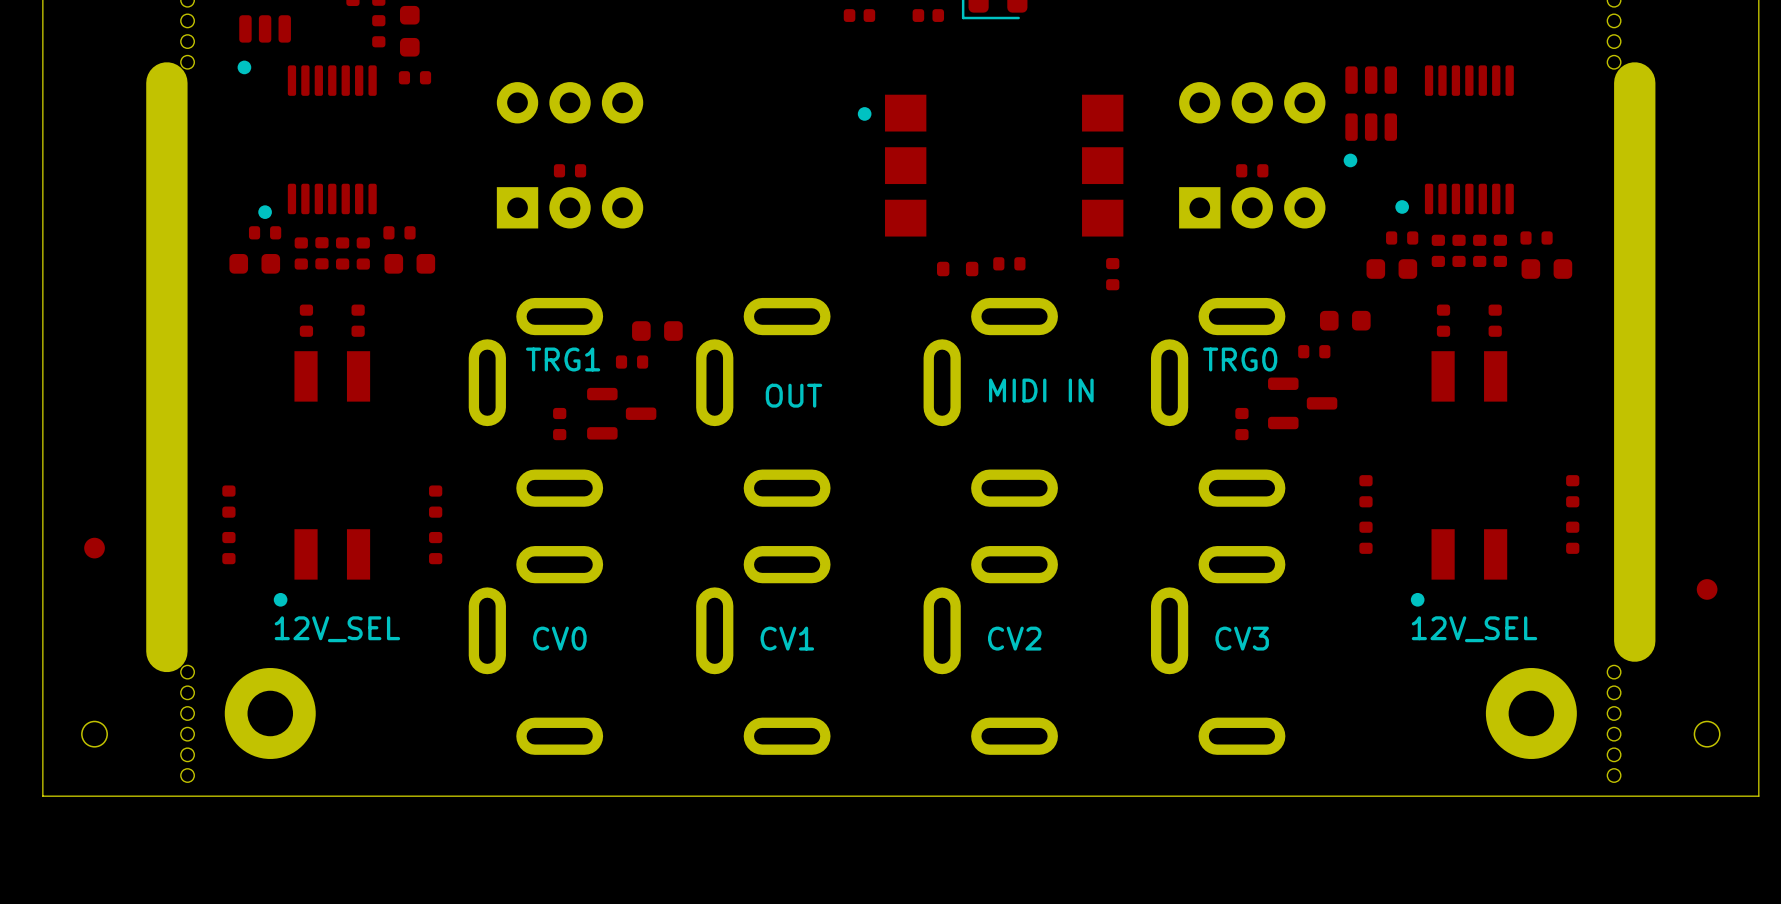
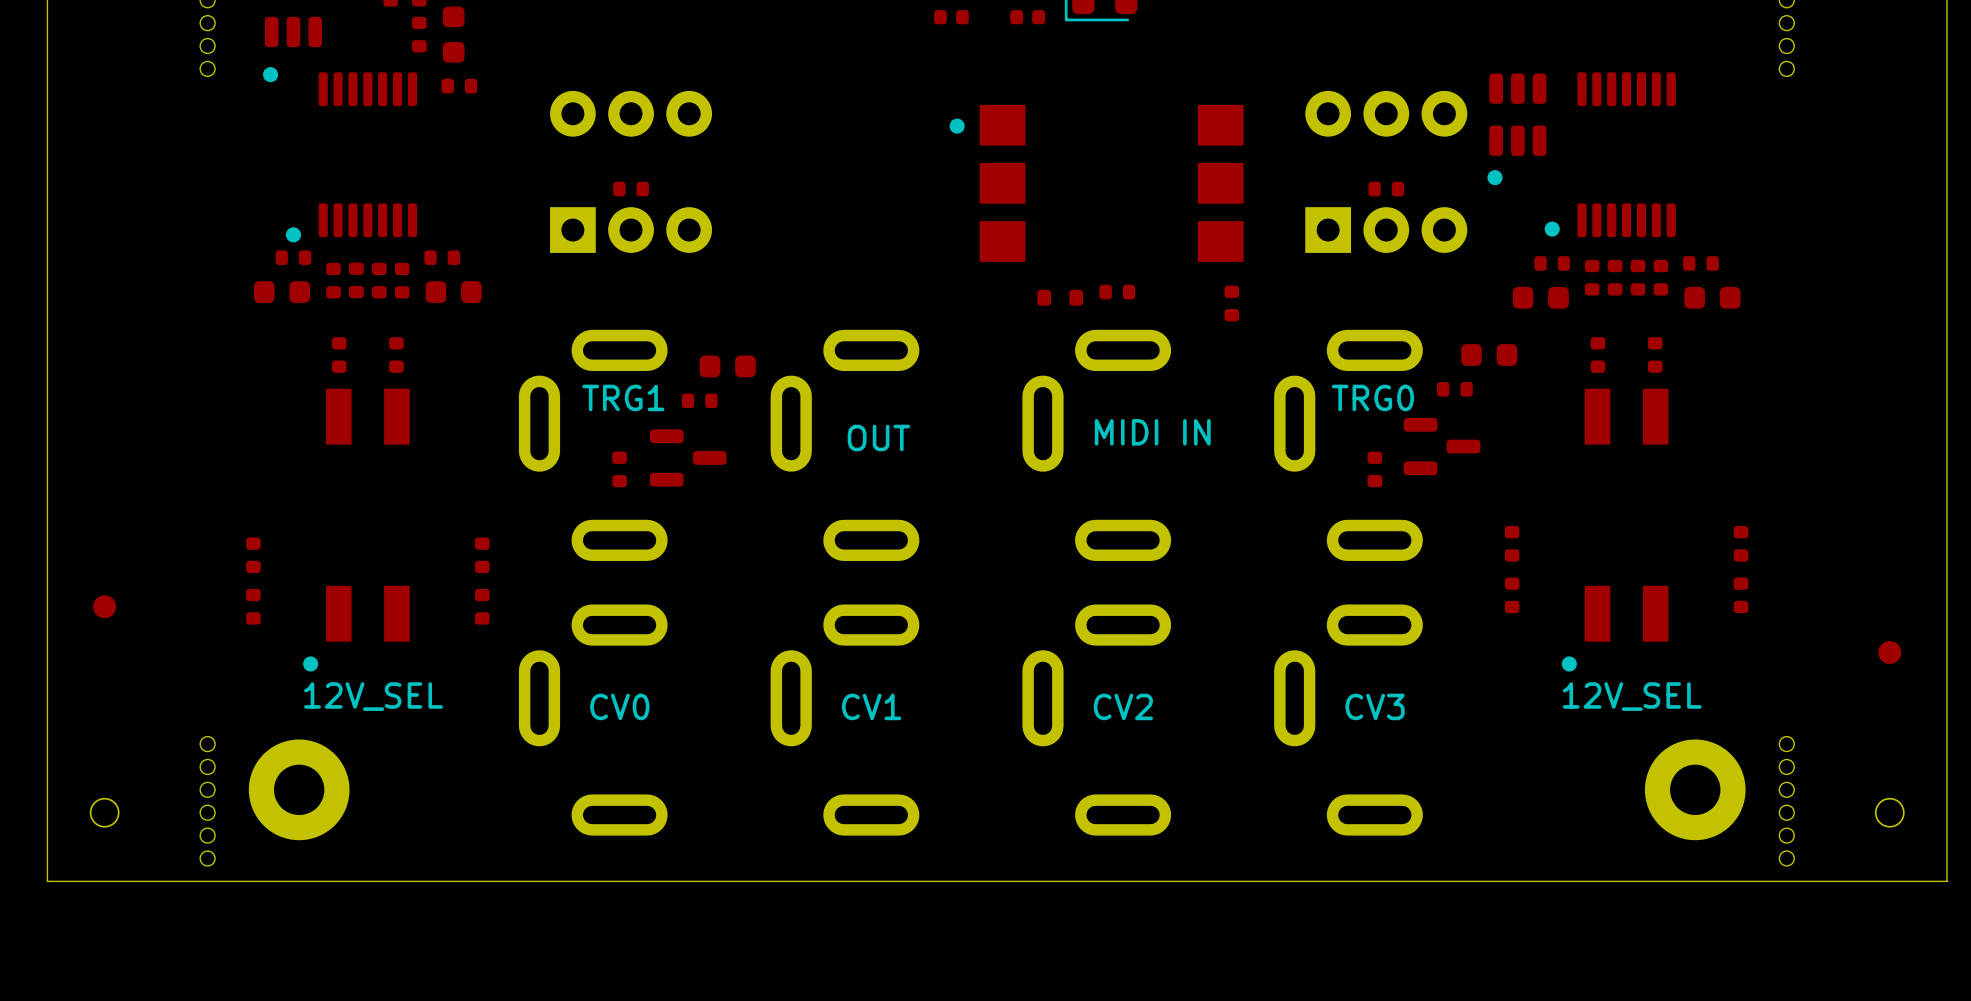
board edge: (166, 82) (166, 651) -> none
board edge: (1634, 82) (1634, 641) -> none

